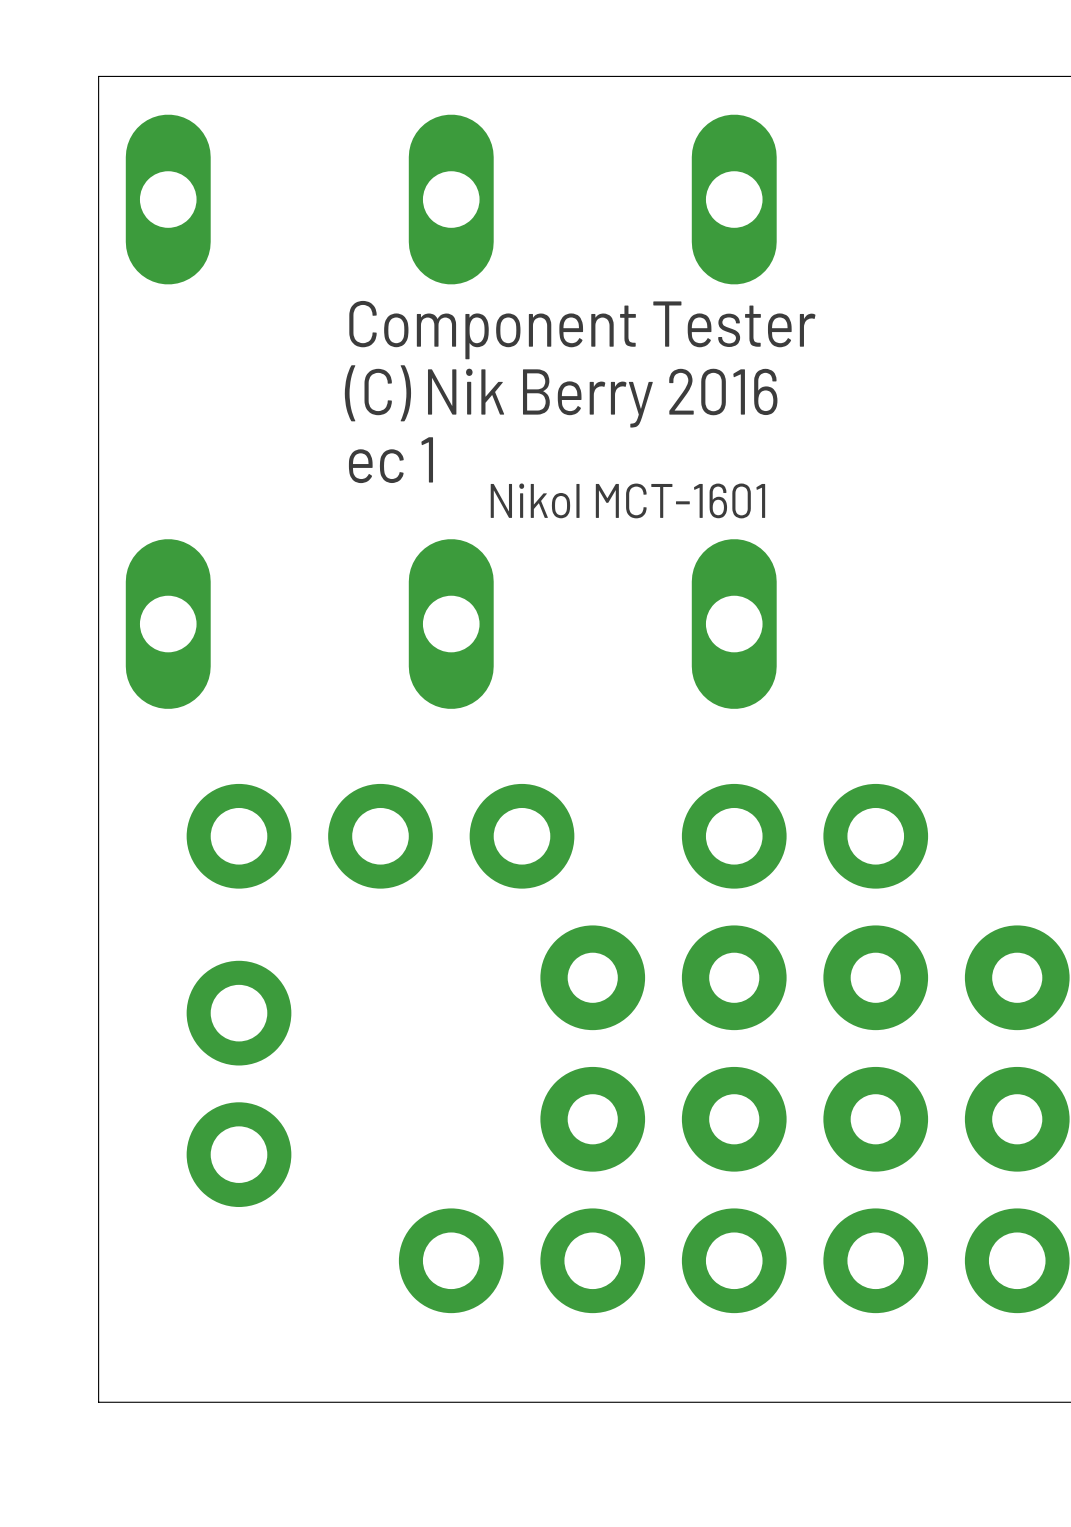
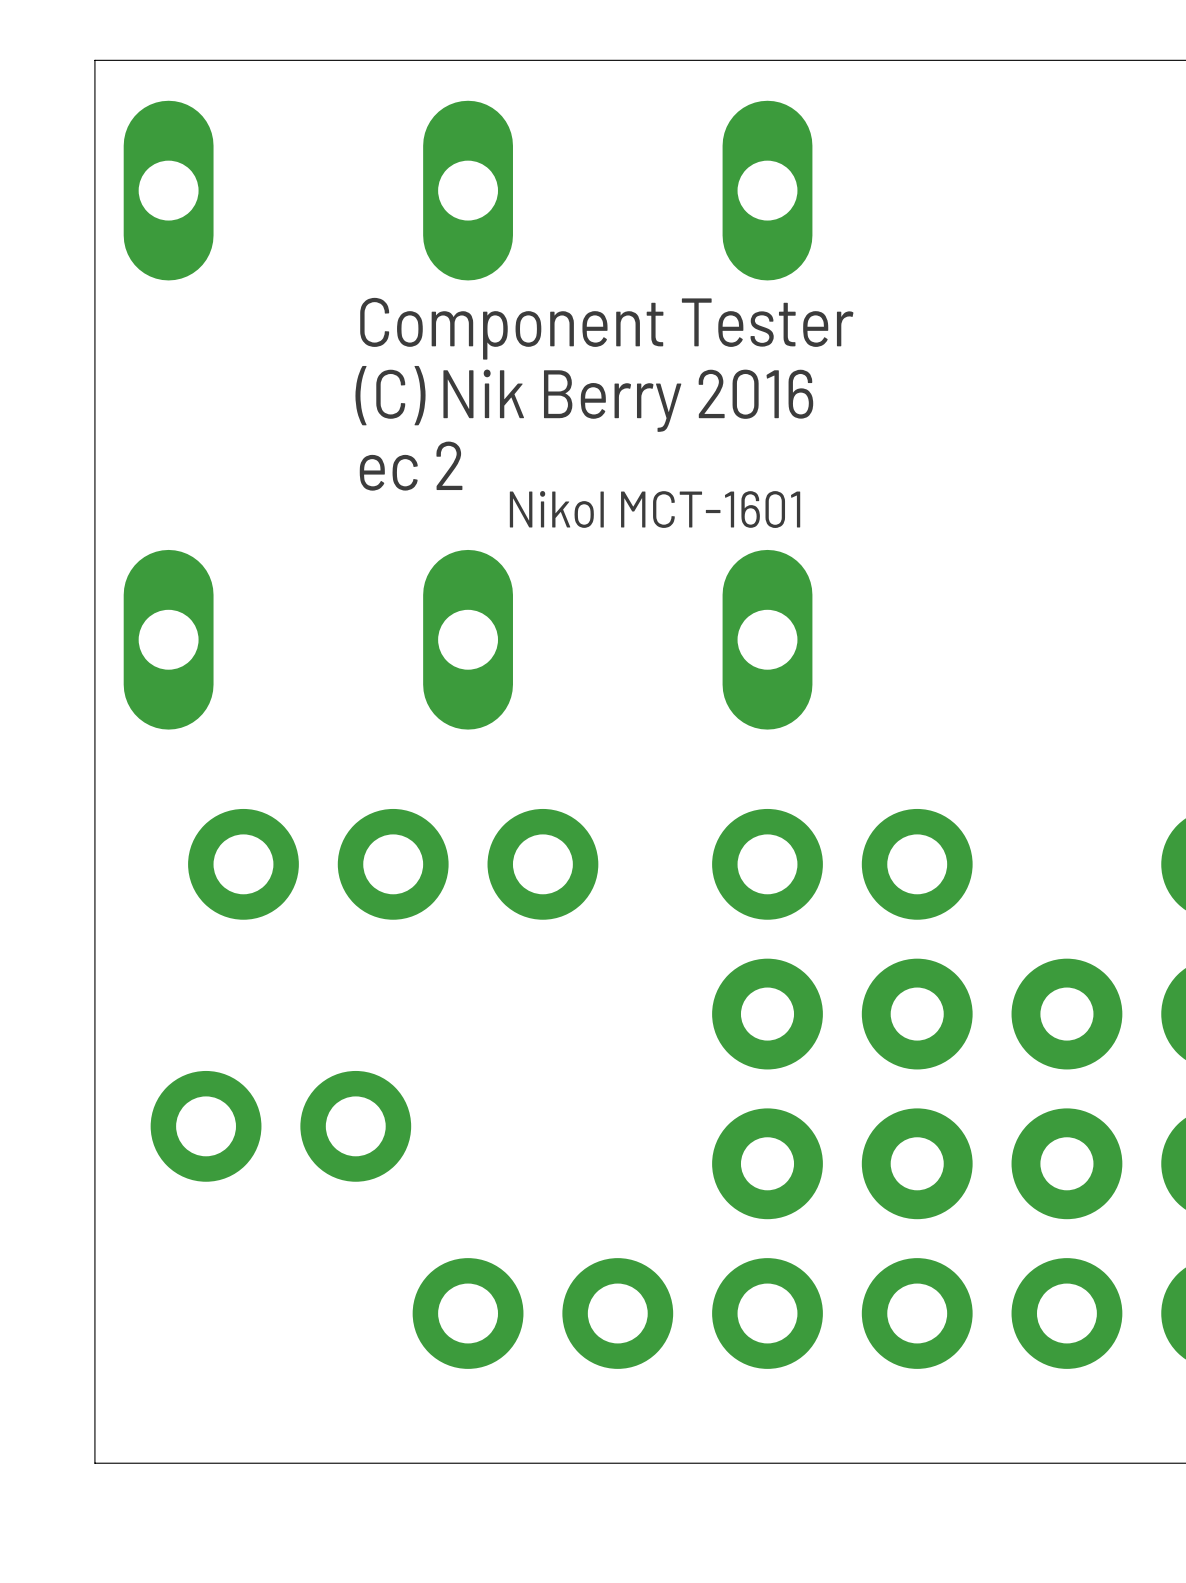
text: ec 1 (390, 460) -> ec 2 (411, 466)
part: (592, 1048) -> none
part rotation: 0° (239, 1083) -> 90° clockwise (280, 1126)

